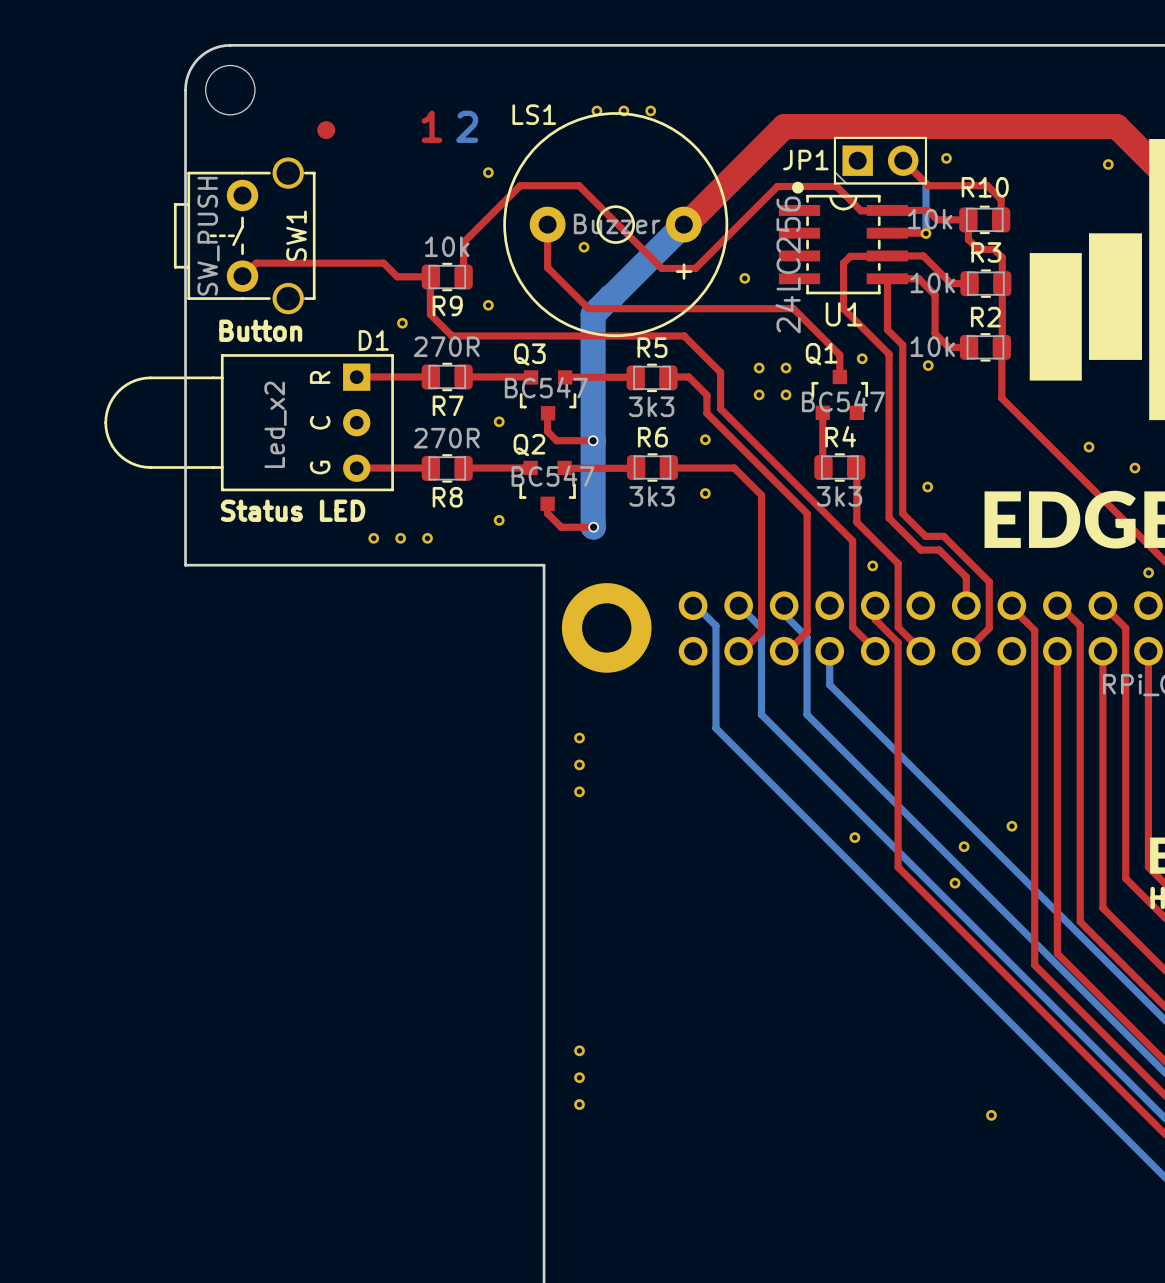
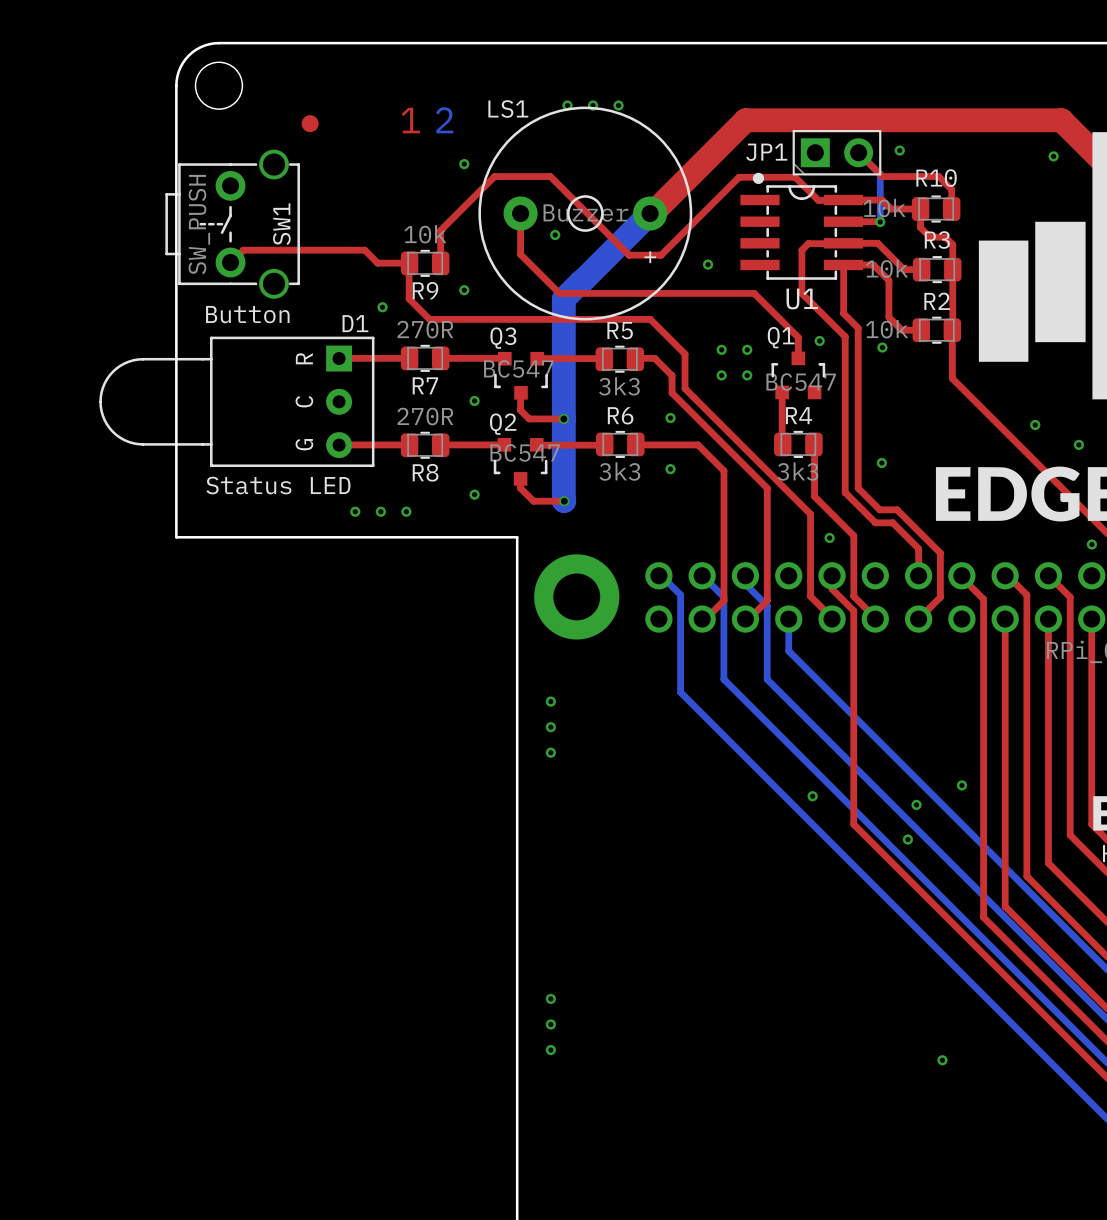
U1 value: 24LC256 (788, 265) -> none
D1 value: Led_x2 (275, 424) -> none

